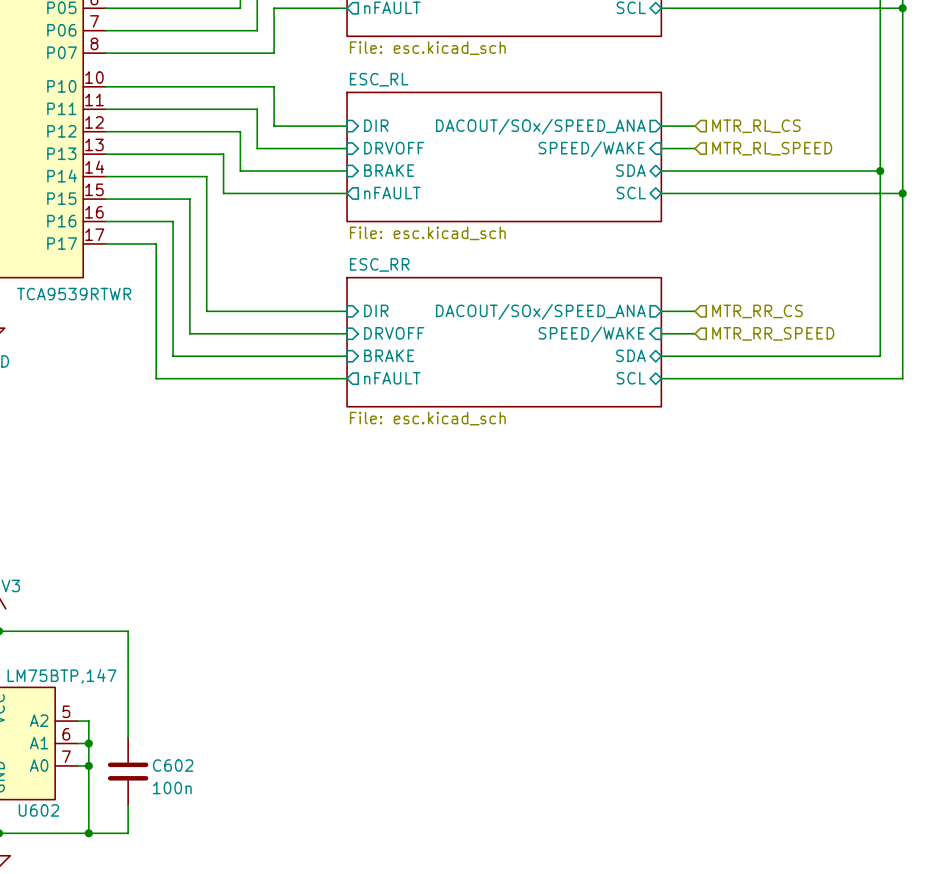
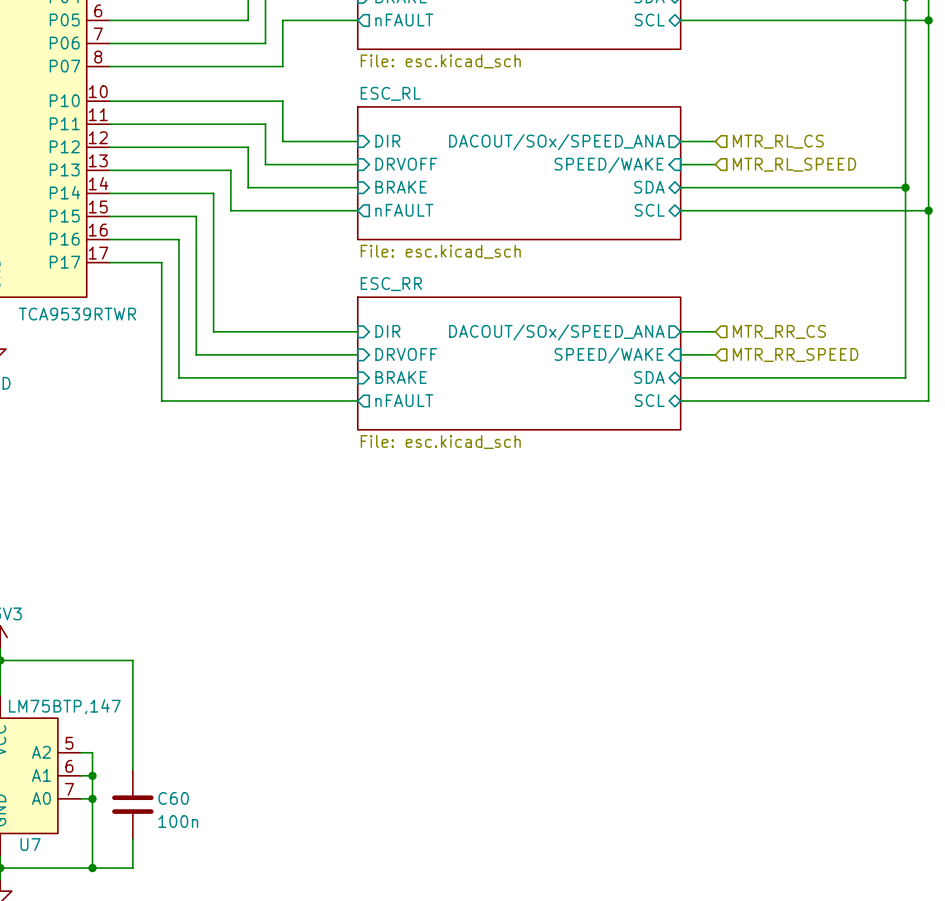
C602 name: C602 (173, 765) -> C60 (173, 798)
U602 name: U602 (38, 810) -> U7 (30, 844)

